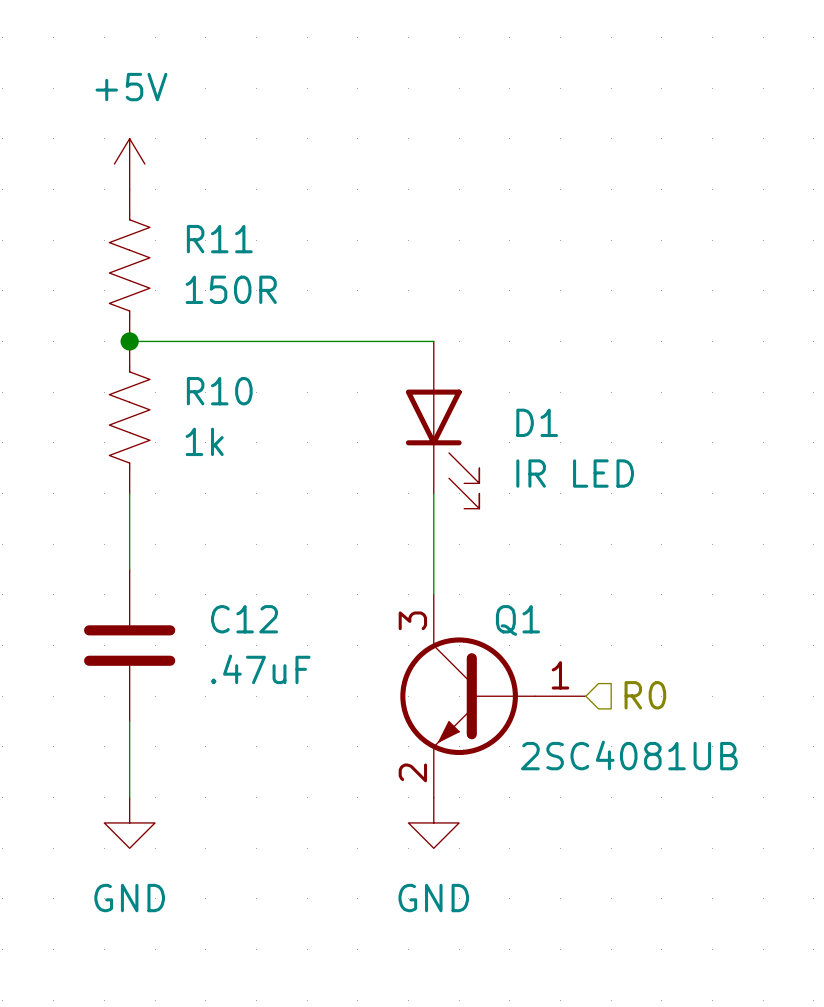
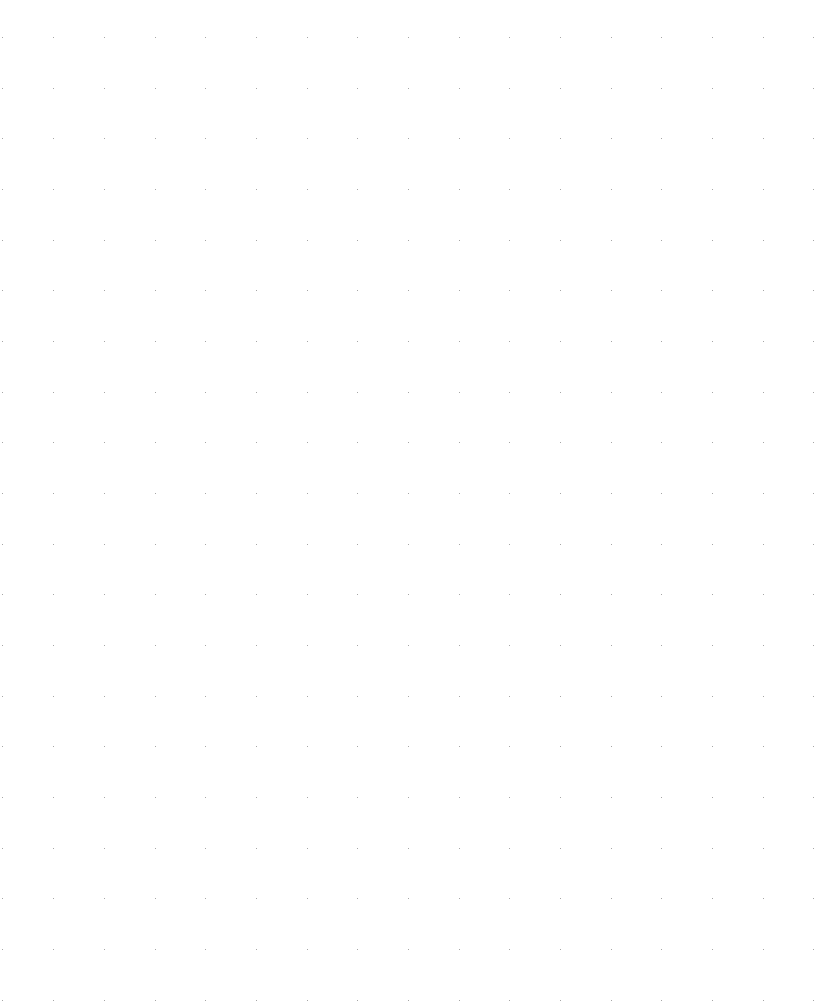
power symbol: +5V (129, 164) -> none
R11: 150R (129, 265) -> none
wire: (129, 341) (433, 341) -> none
junction: (129, 341) -> none
R10: 1k (129, 417) -> none
D1: IR LED (442, 425) -> none
wire: (129, 493) (129, 569) -> none
wire: (433, 493) (433, 594) -> none
C12: .47uF (129, 645) -> none
hierarchical label: R0 (645, 695) -> none
Q1: 2SC4081UB (493, 696) -> none
wire: (129, 721) (129, 797) -> none
power symbol: GND (129, 822) -> none
power symbol: GND (433, 822) -> none

